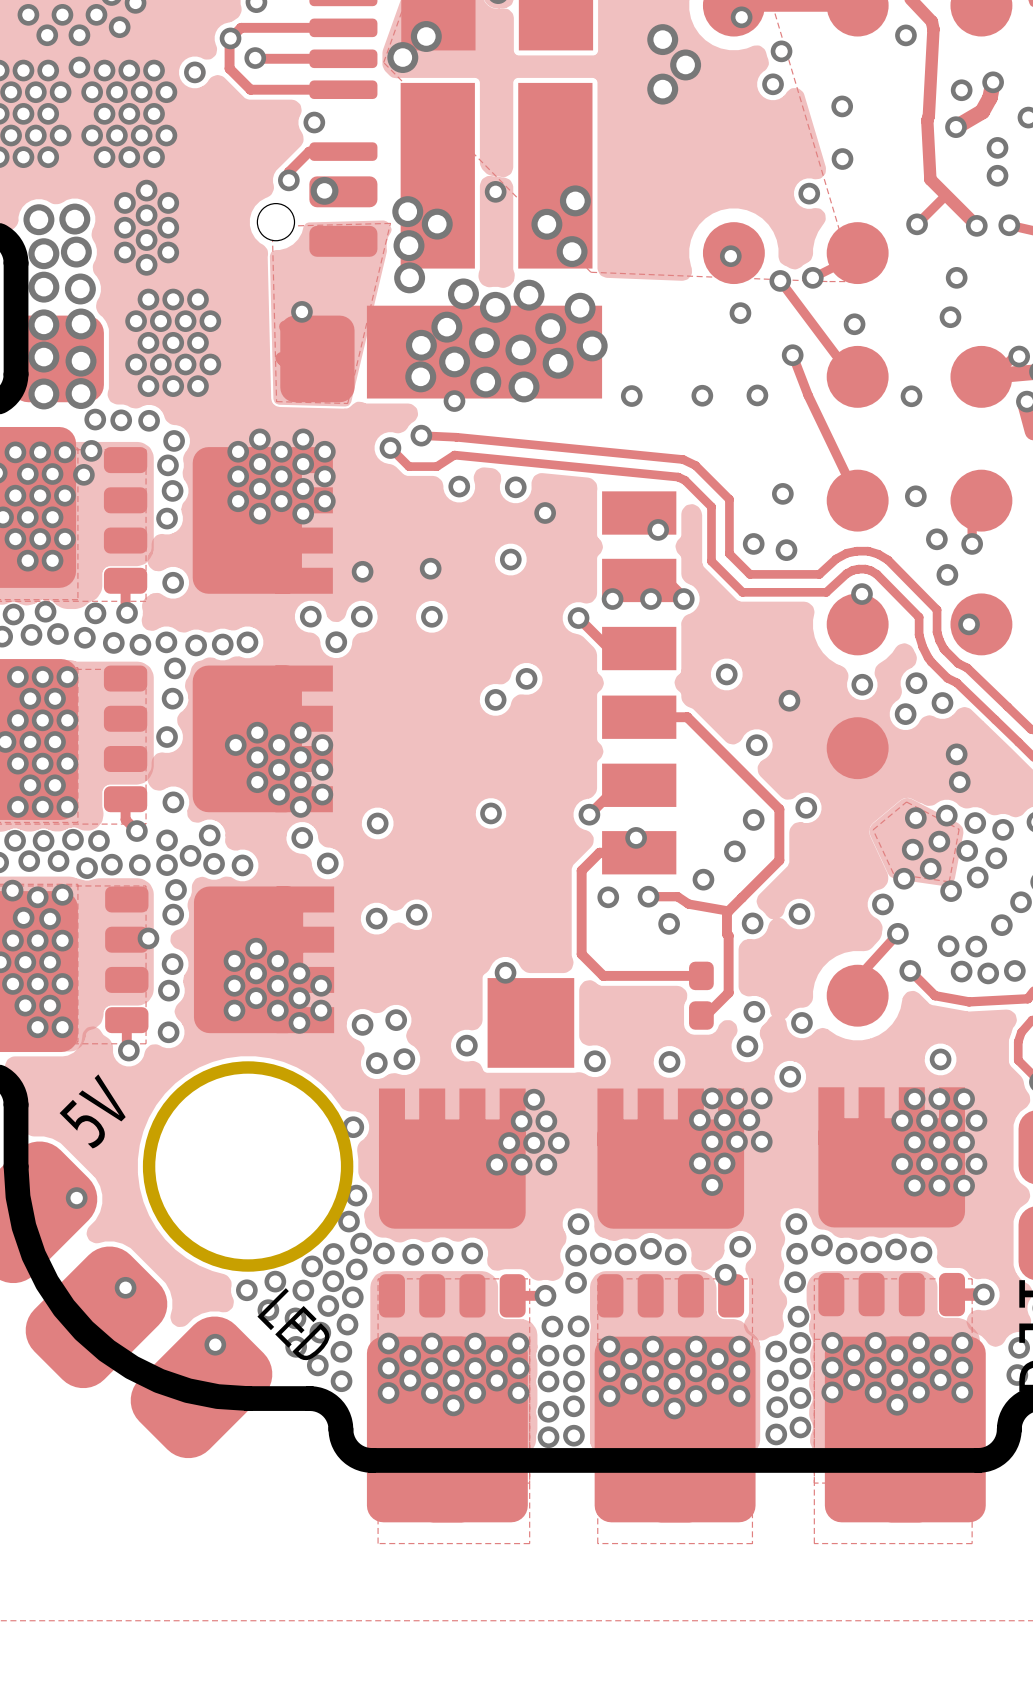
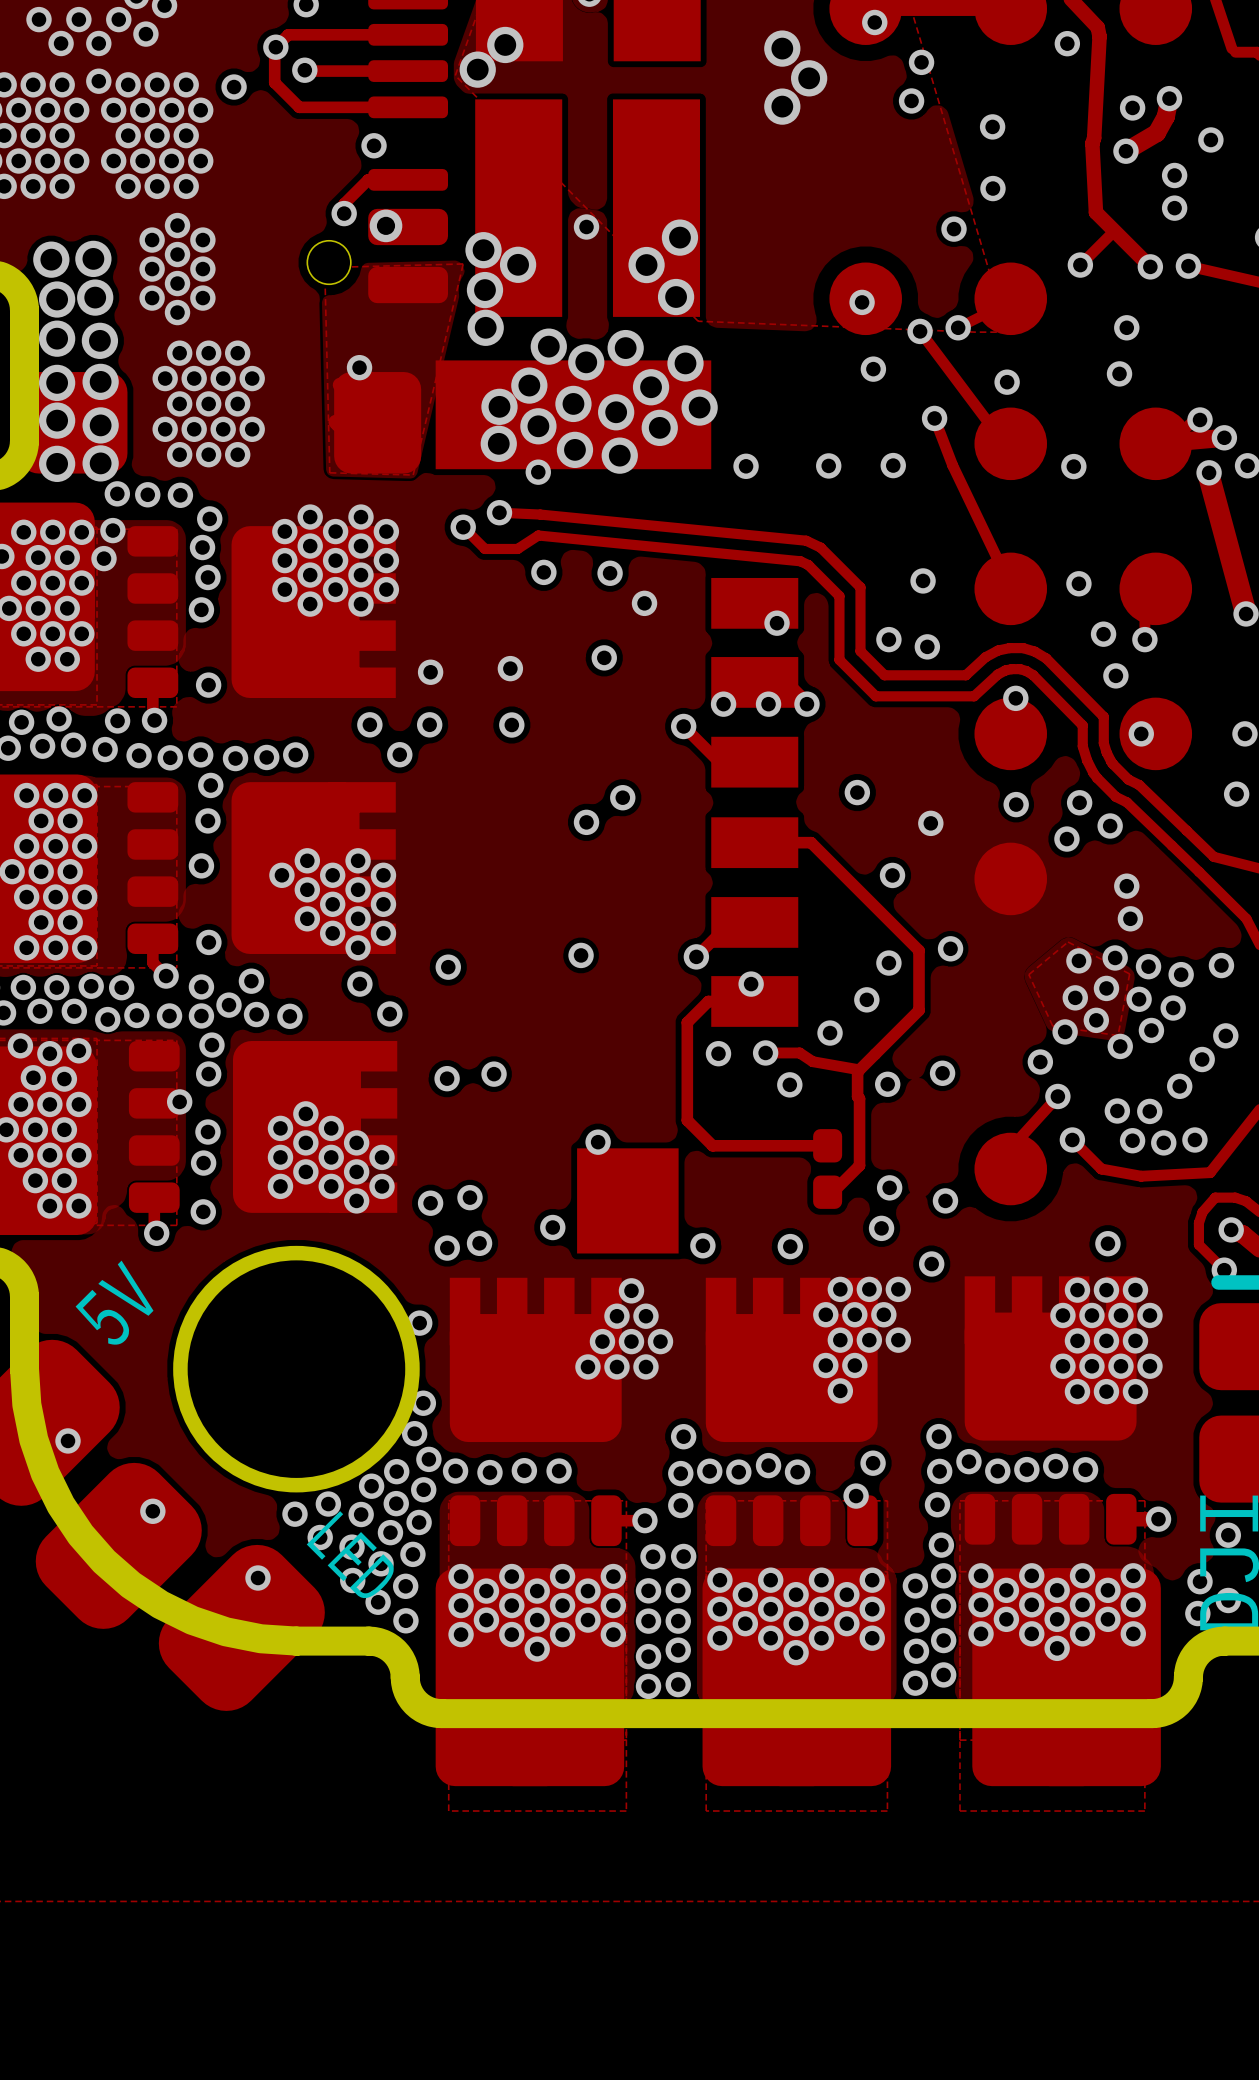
via position: (76, 1198) -> (68, 1440)

